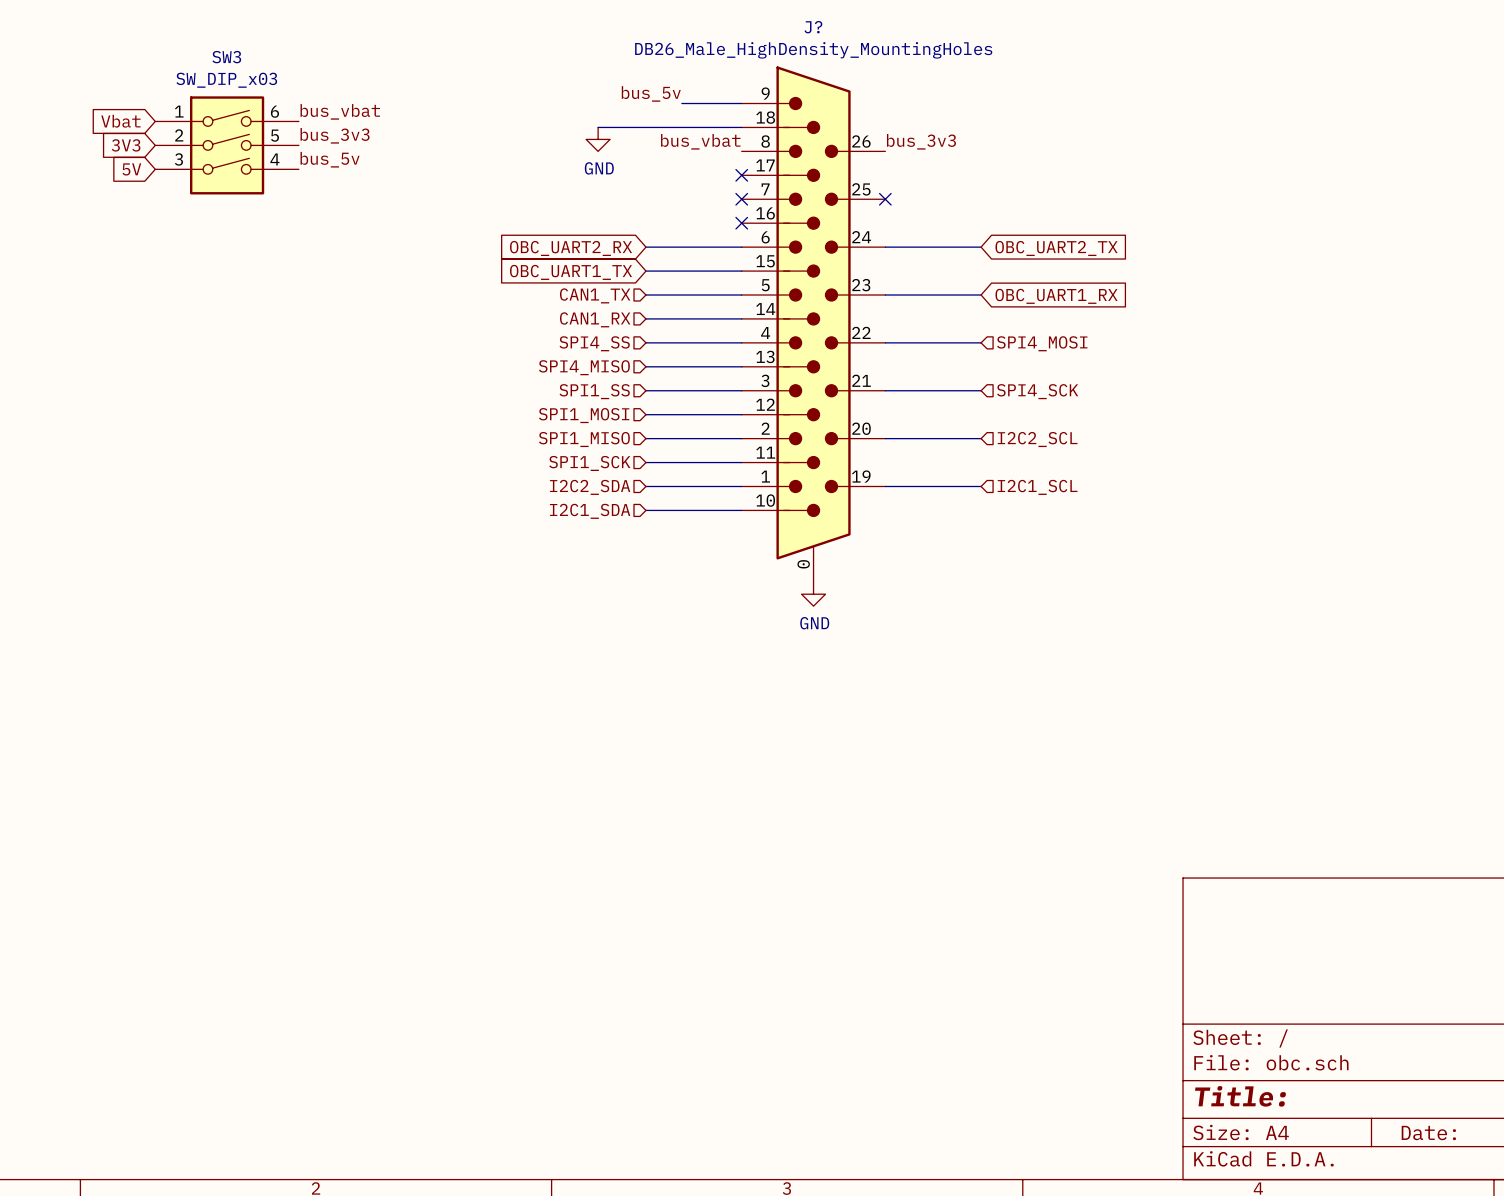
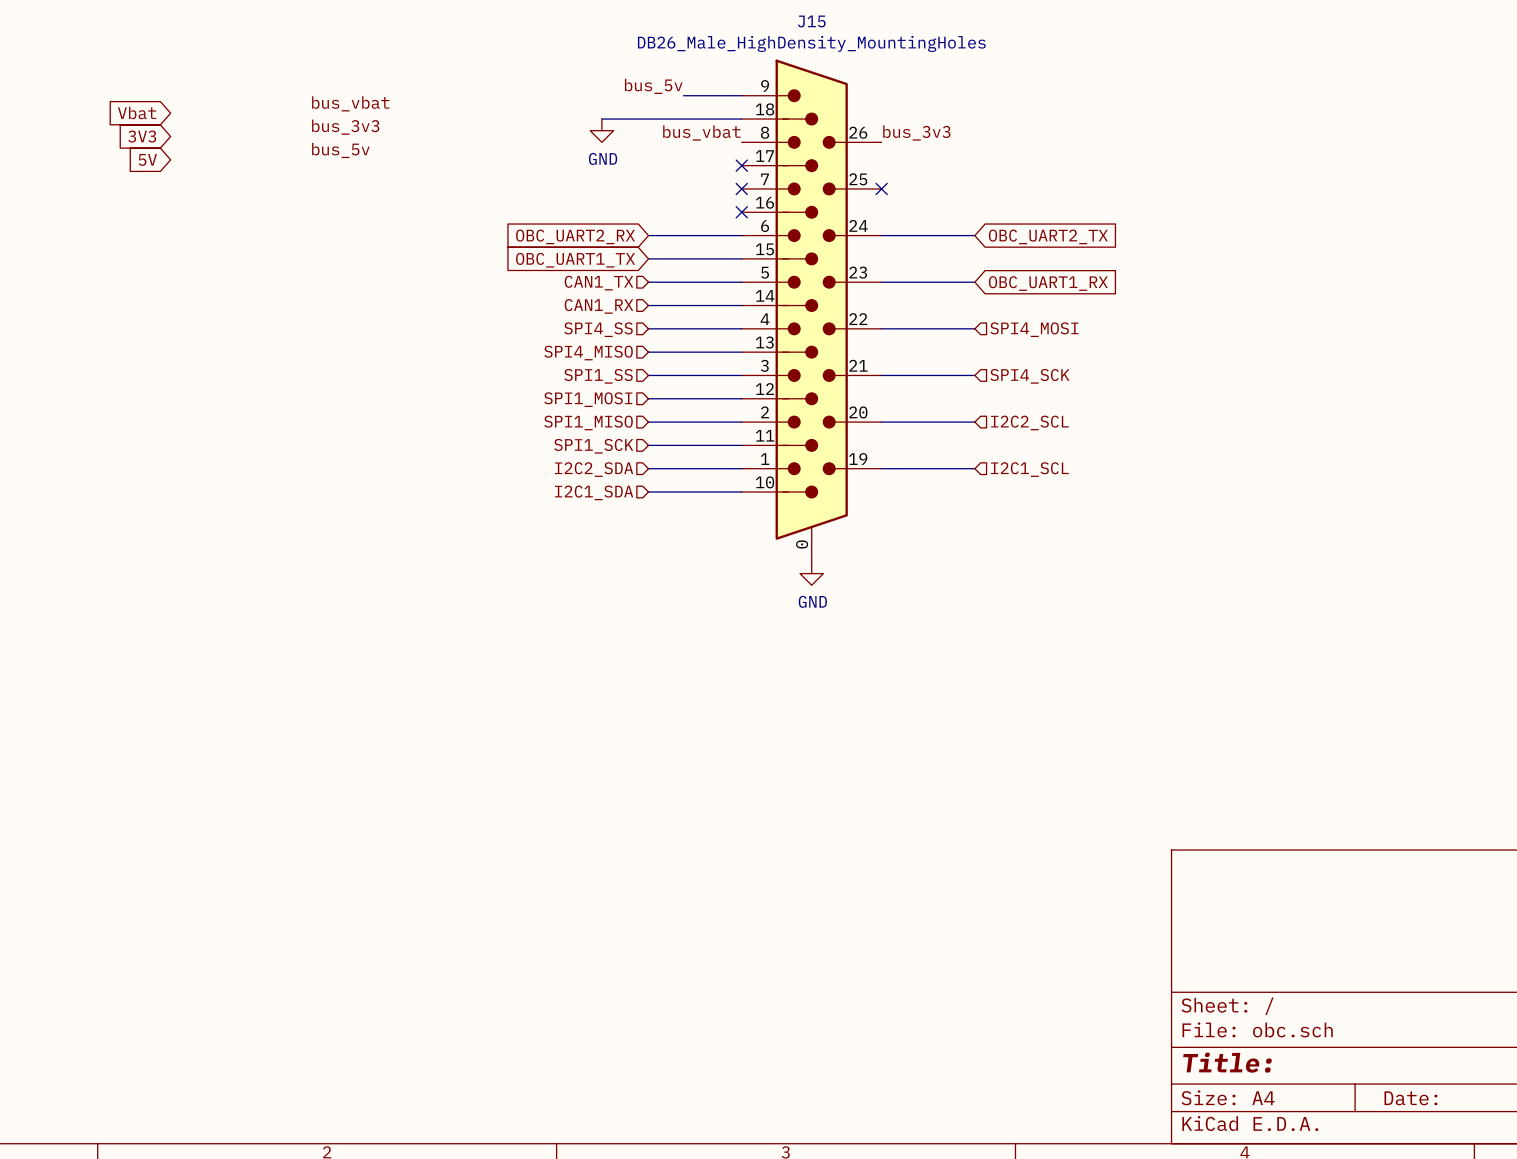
J? name: J? (813, 27) -> J15 (811, 21)
SW3: SW_DIP_x03 (227, 145) -> none

